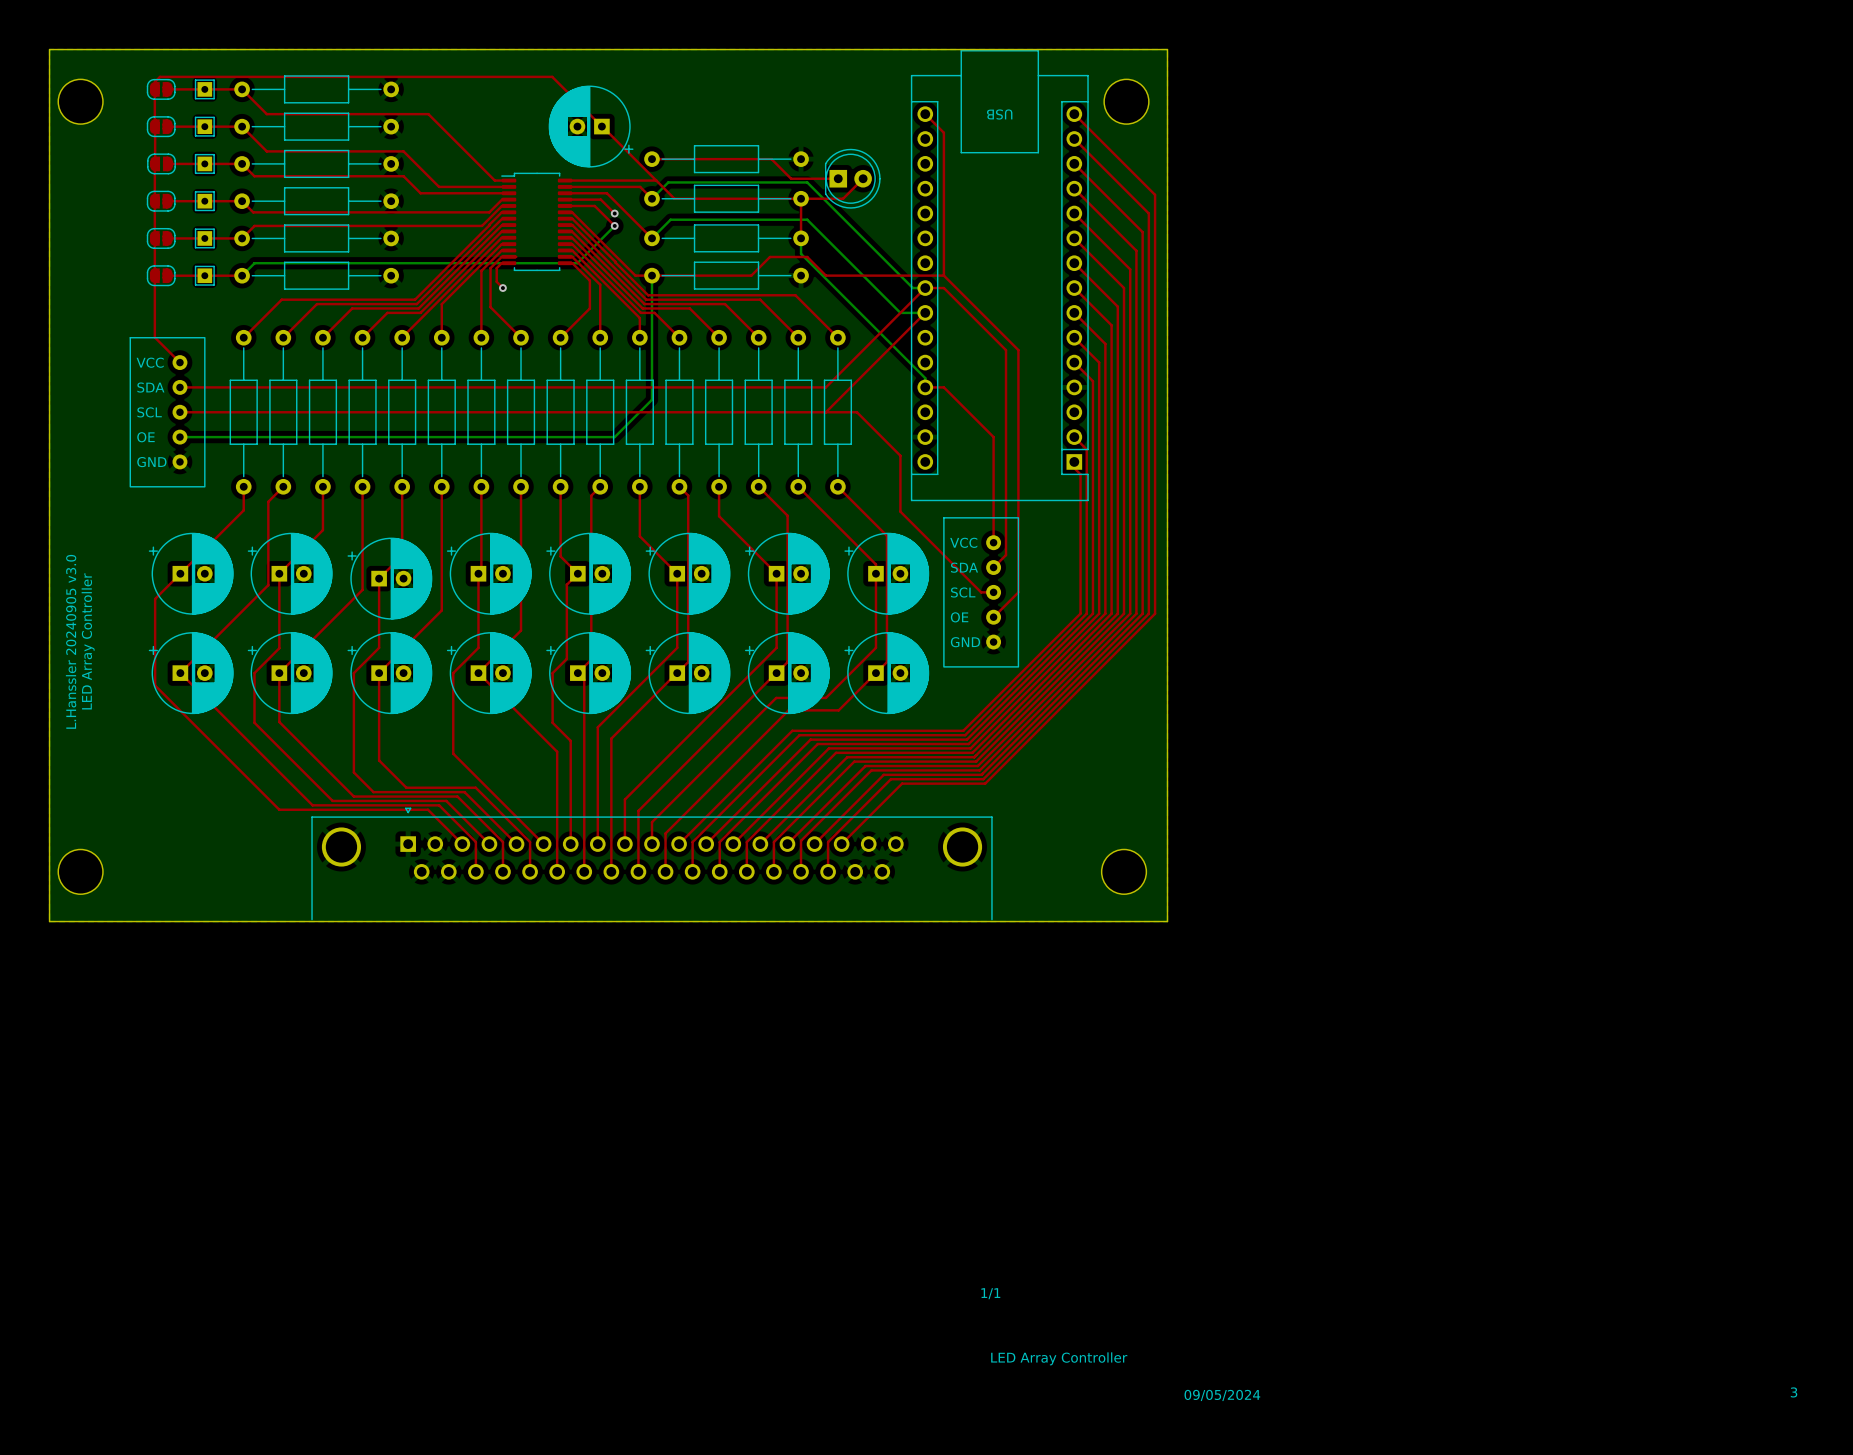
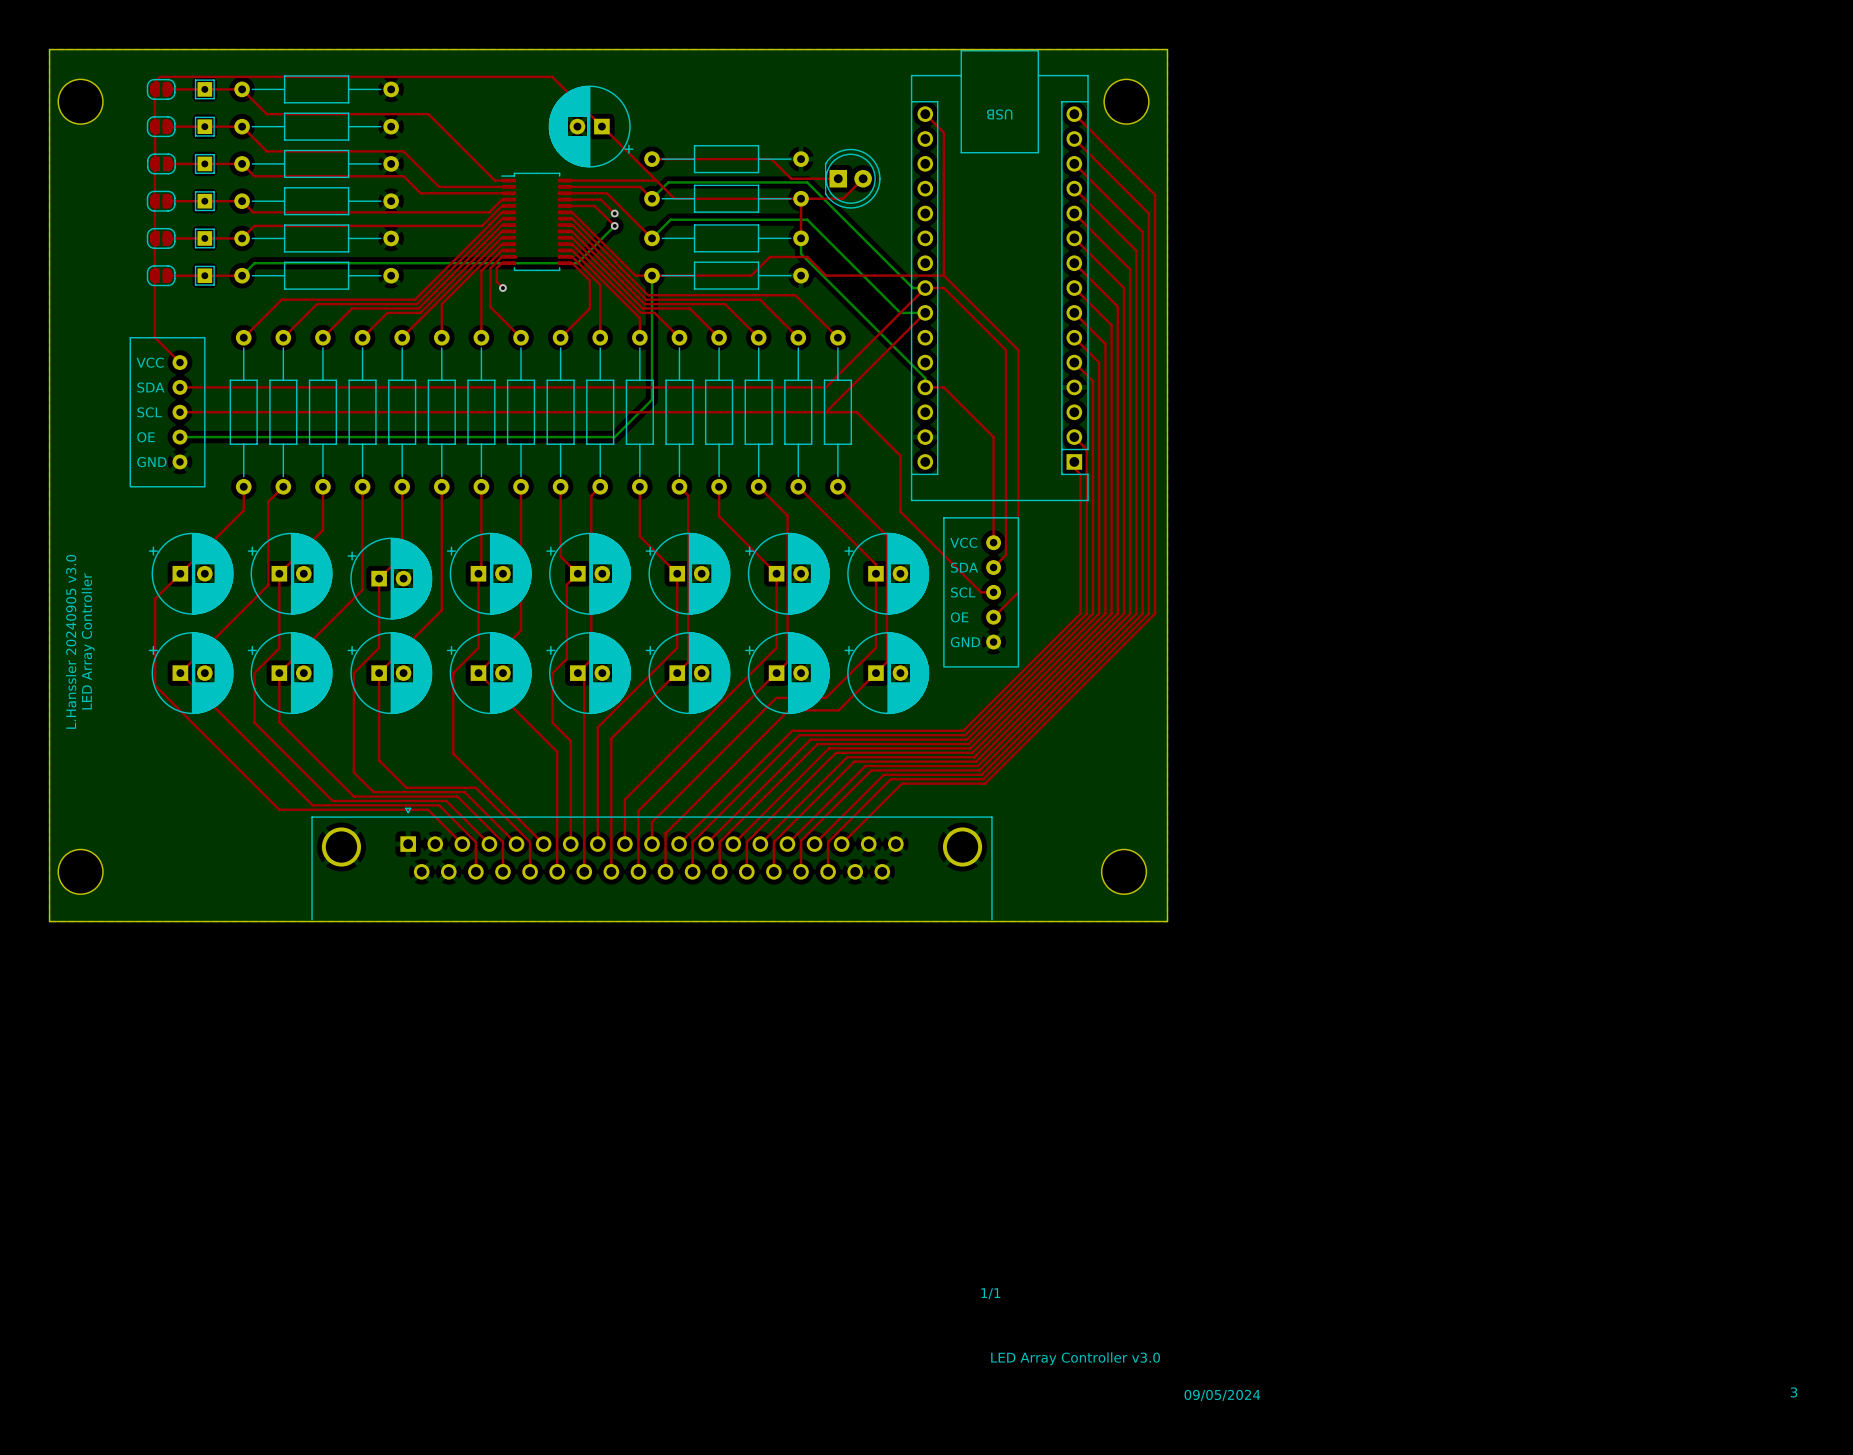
text: LED Array Controller (1059, 1358) -> LED Array Controller v3.0 (1075, 1358)

